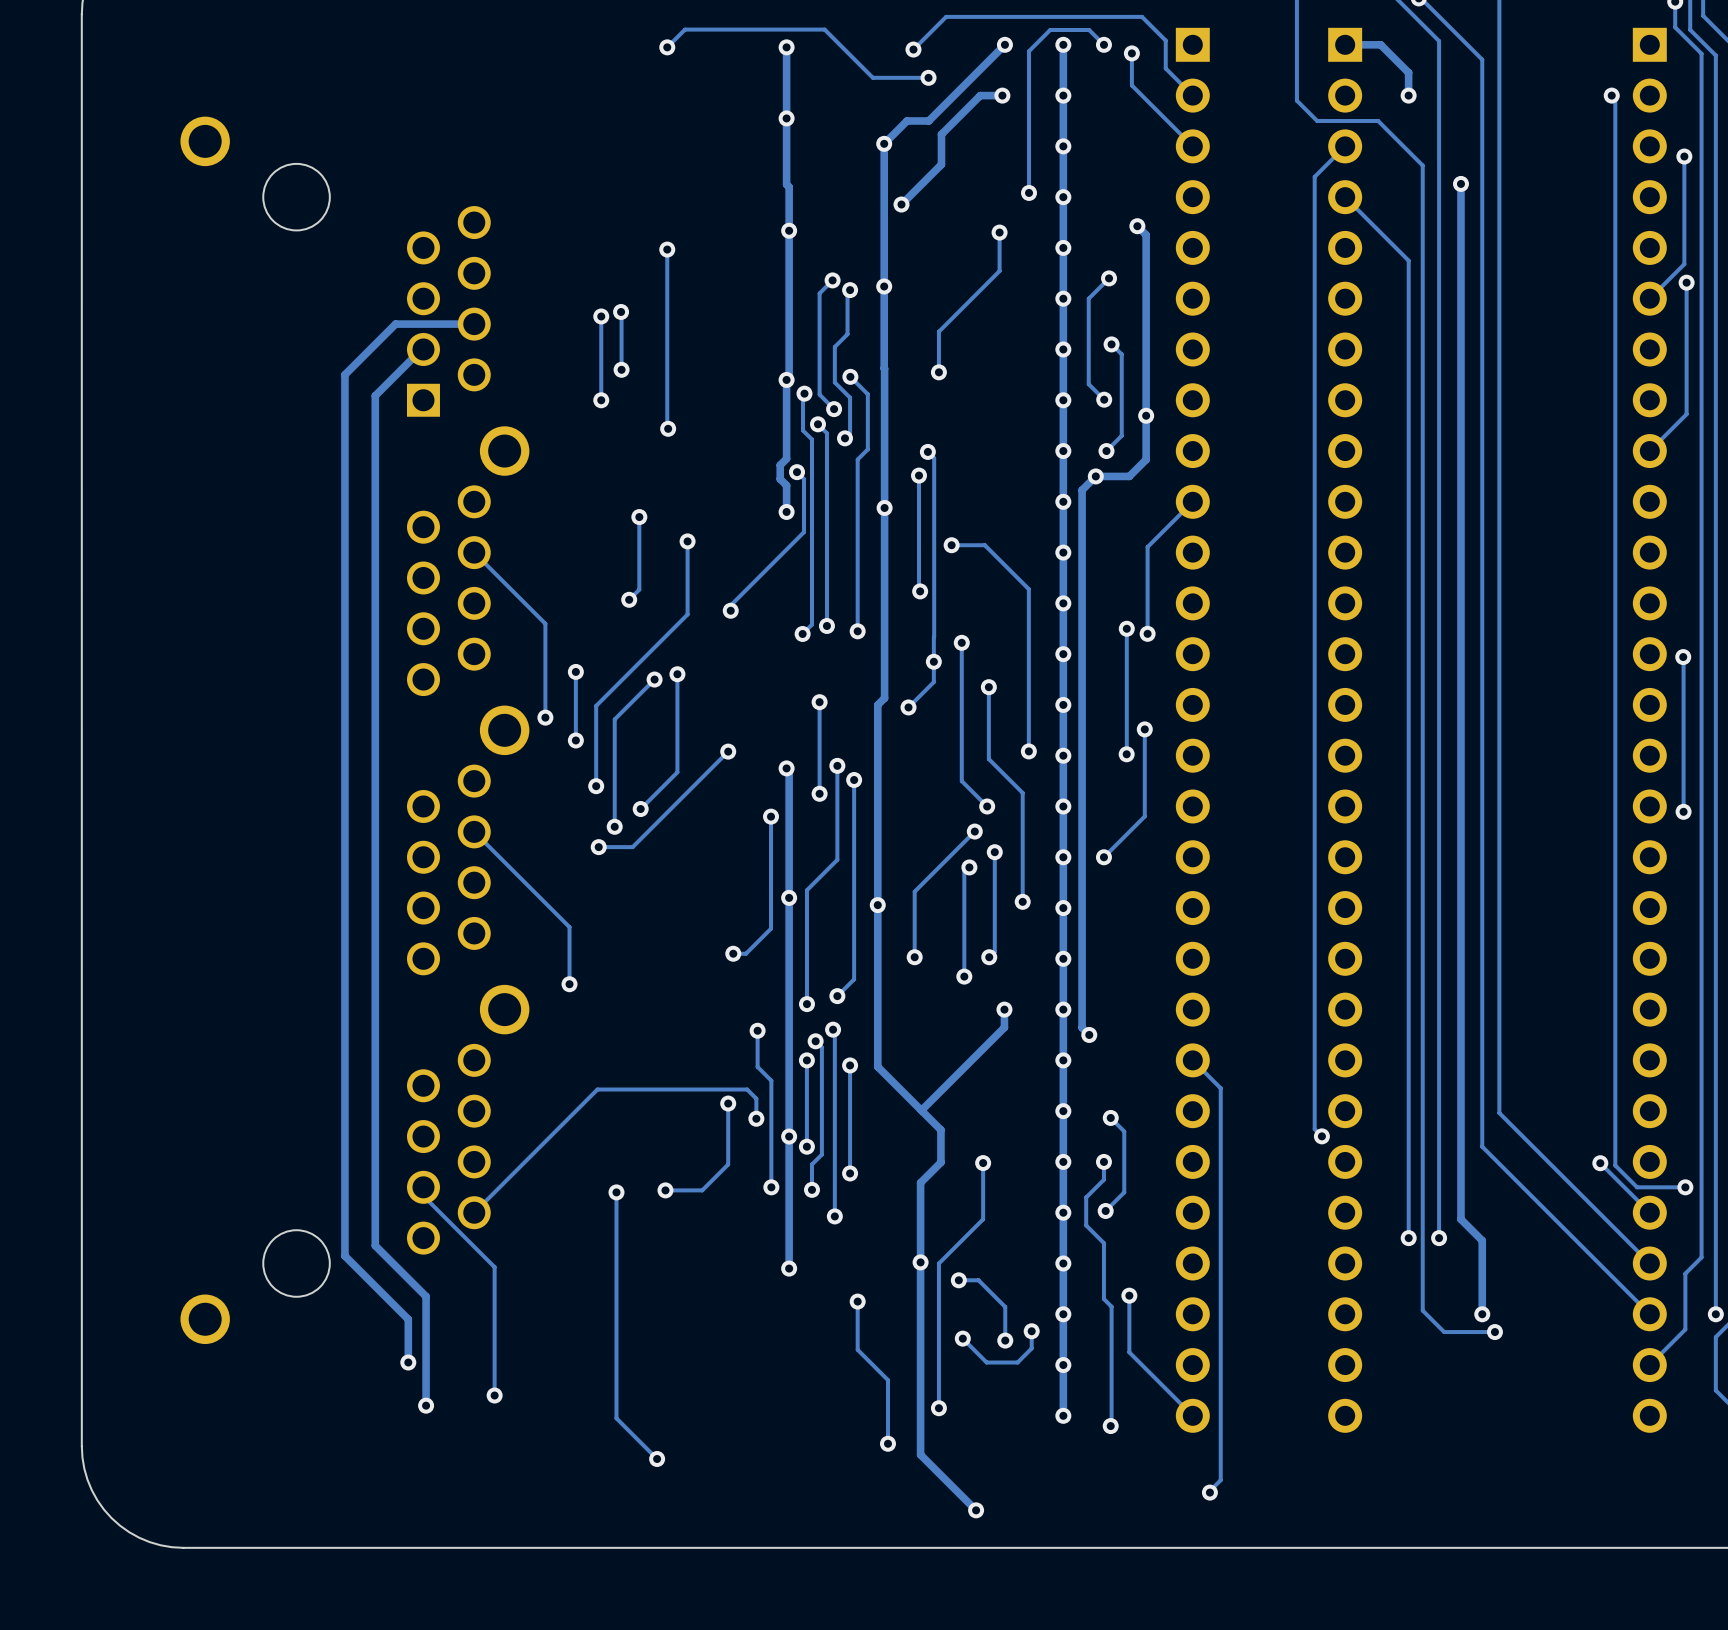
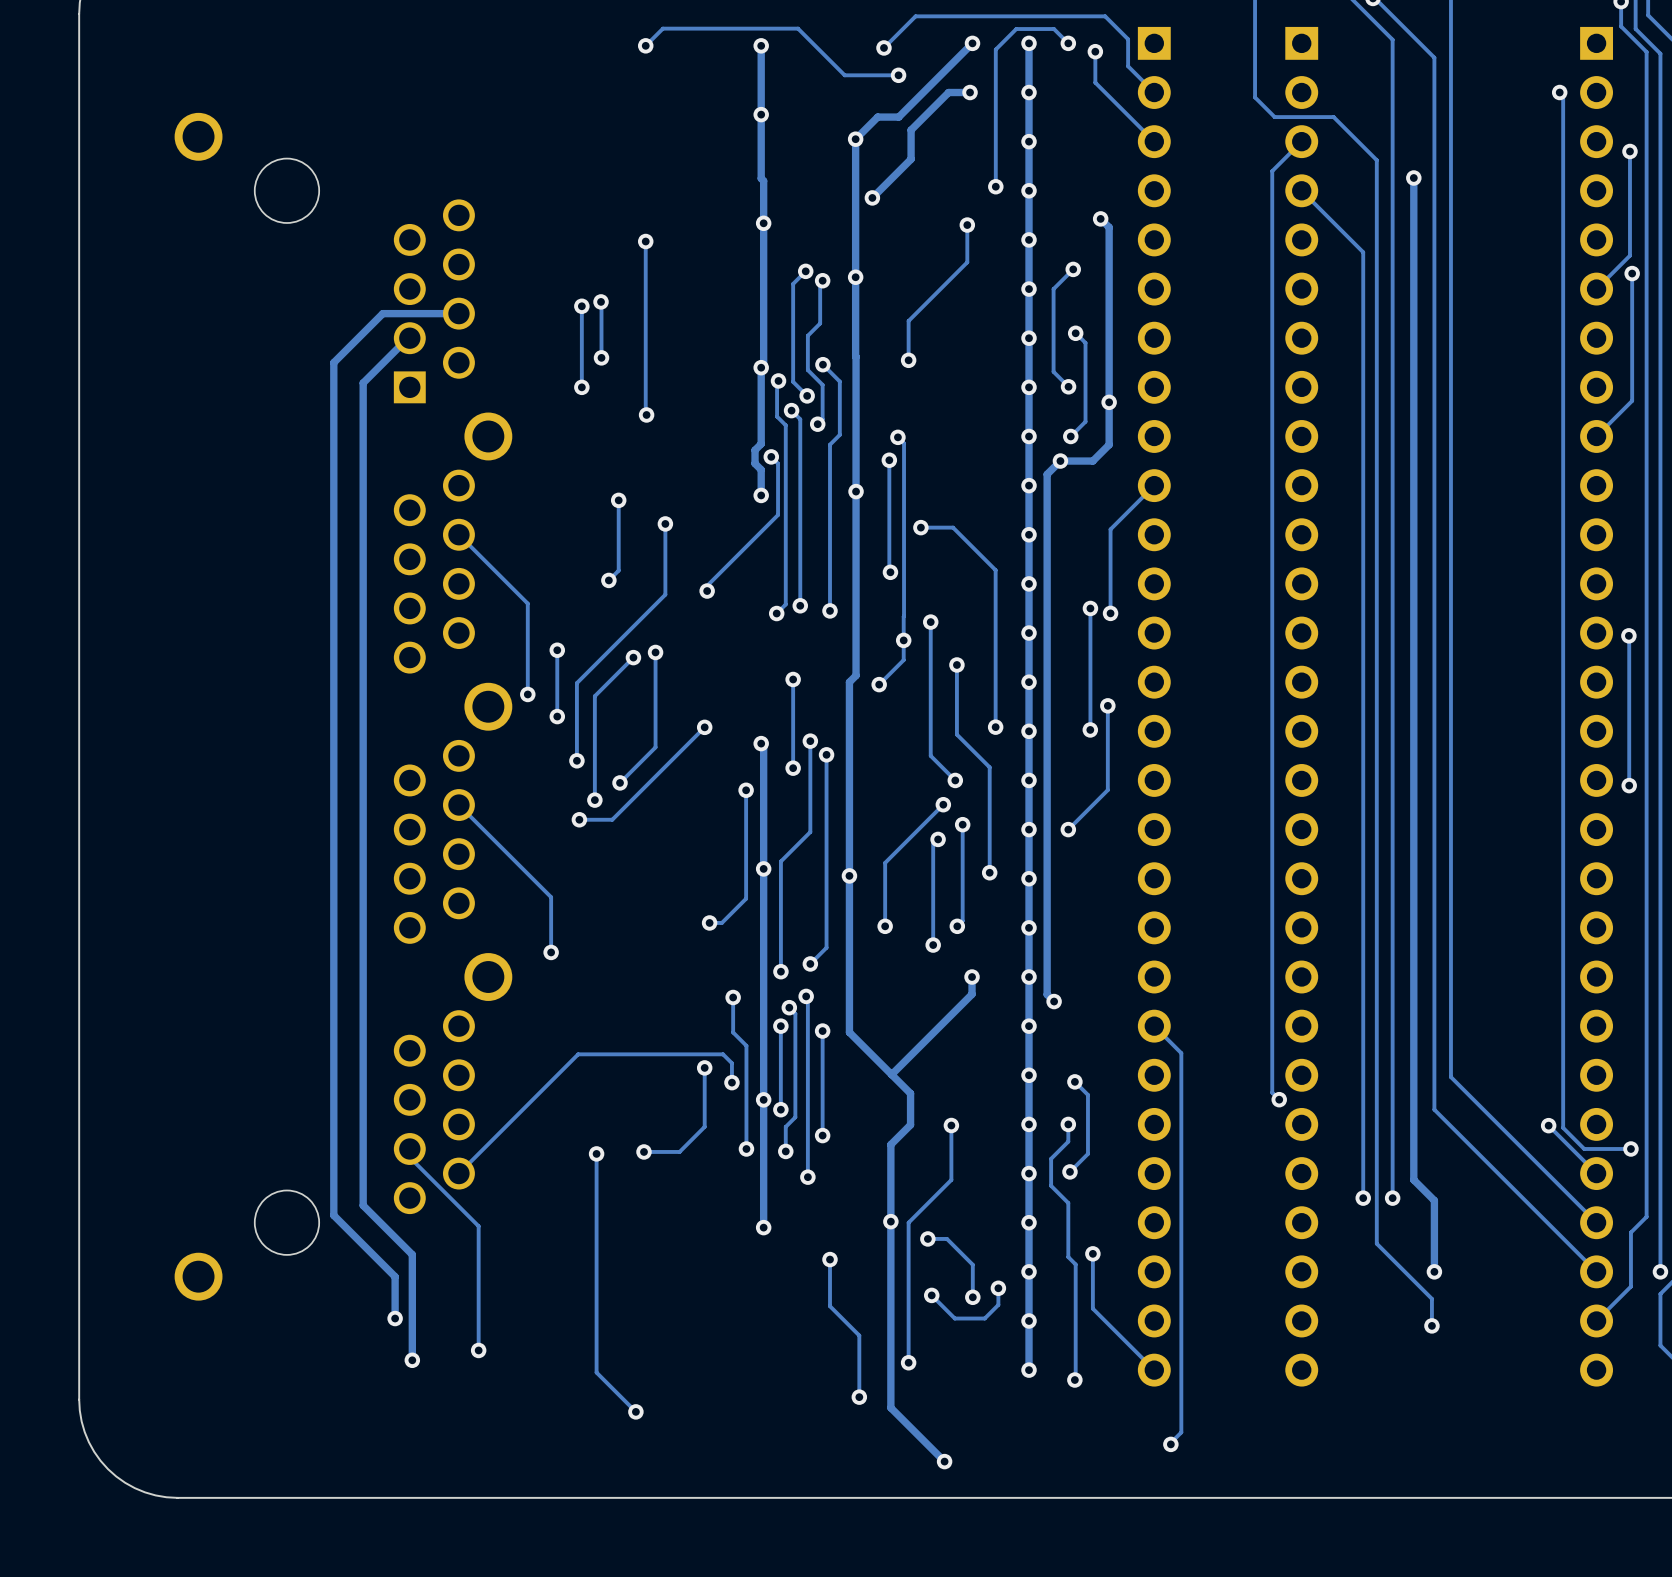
track: (1345, 44) (1380, 44) (1408, 72) (1408, 95) -> none
via: (1408, 95) -> none
track: (1422, 1285) (1422, 1310) (1444, 1332) (1494, 1332) -> (1376, 1243) (1431, 1298) (1431, 1325)
via position: (1494, 1332) -> (1431, 1325)

